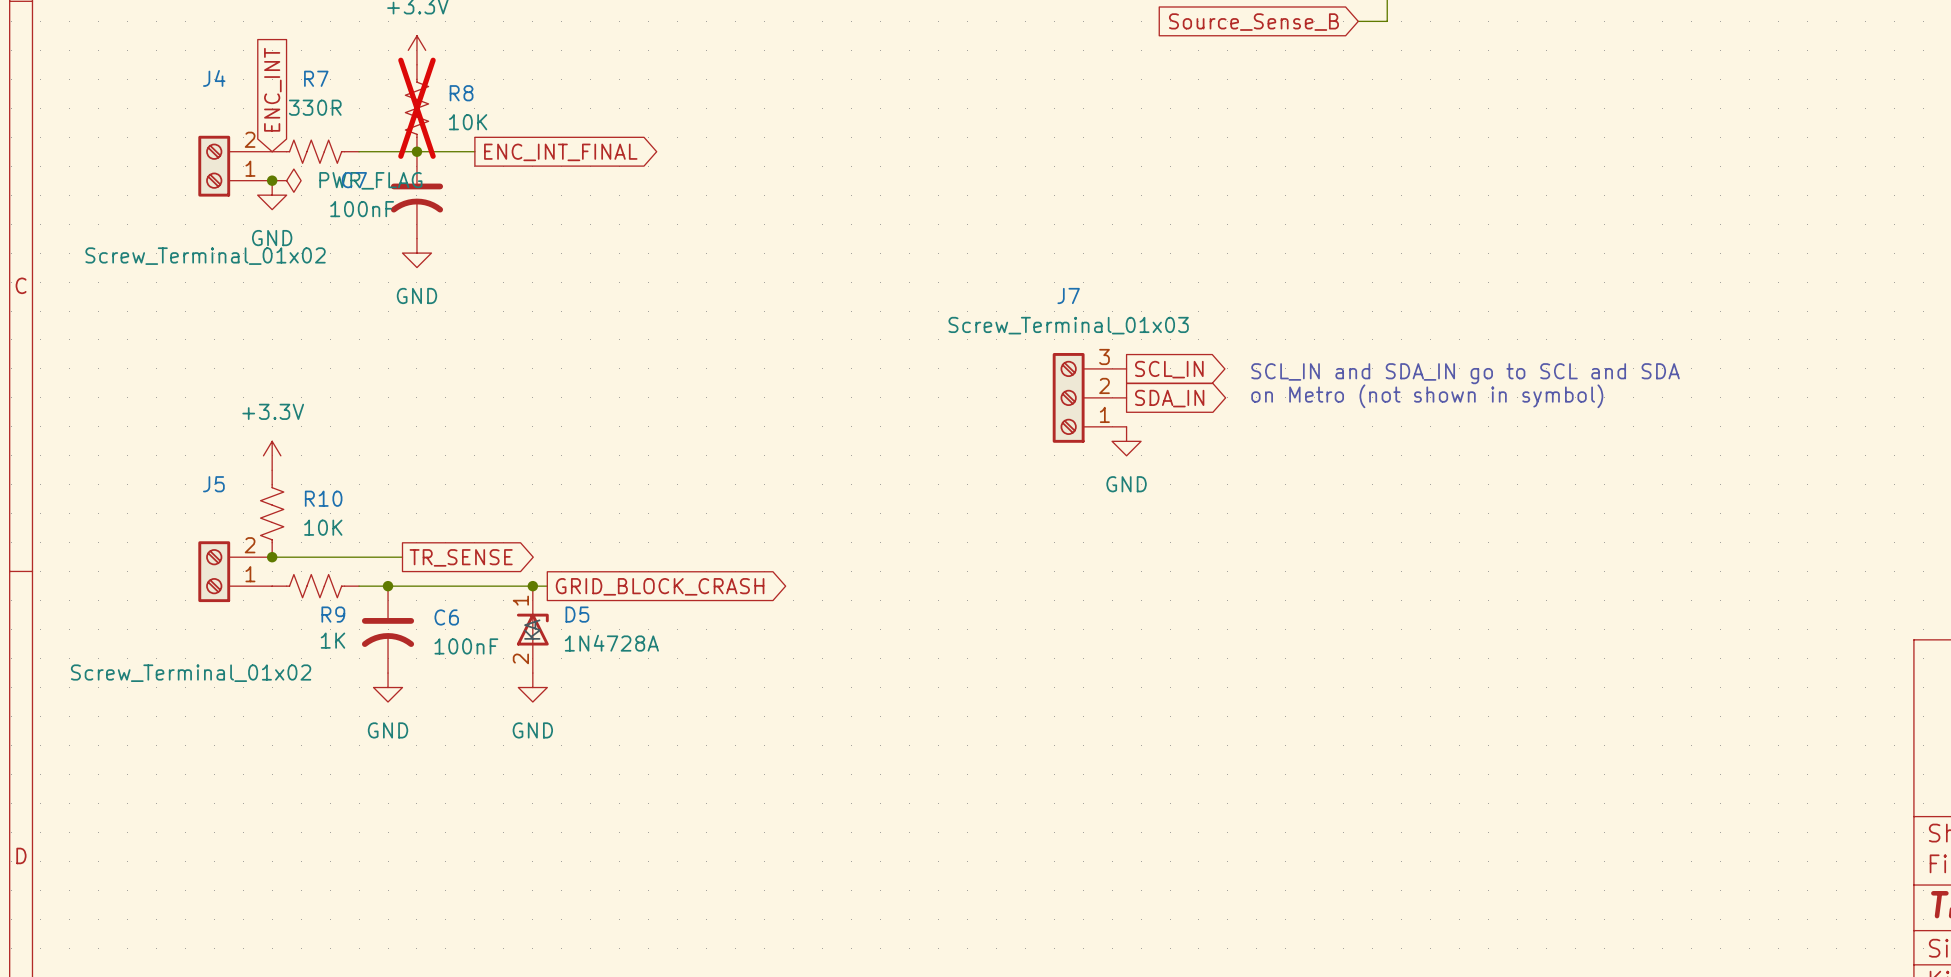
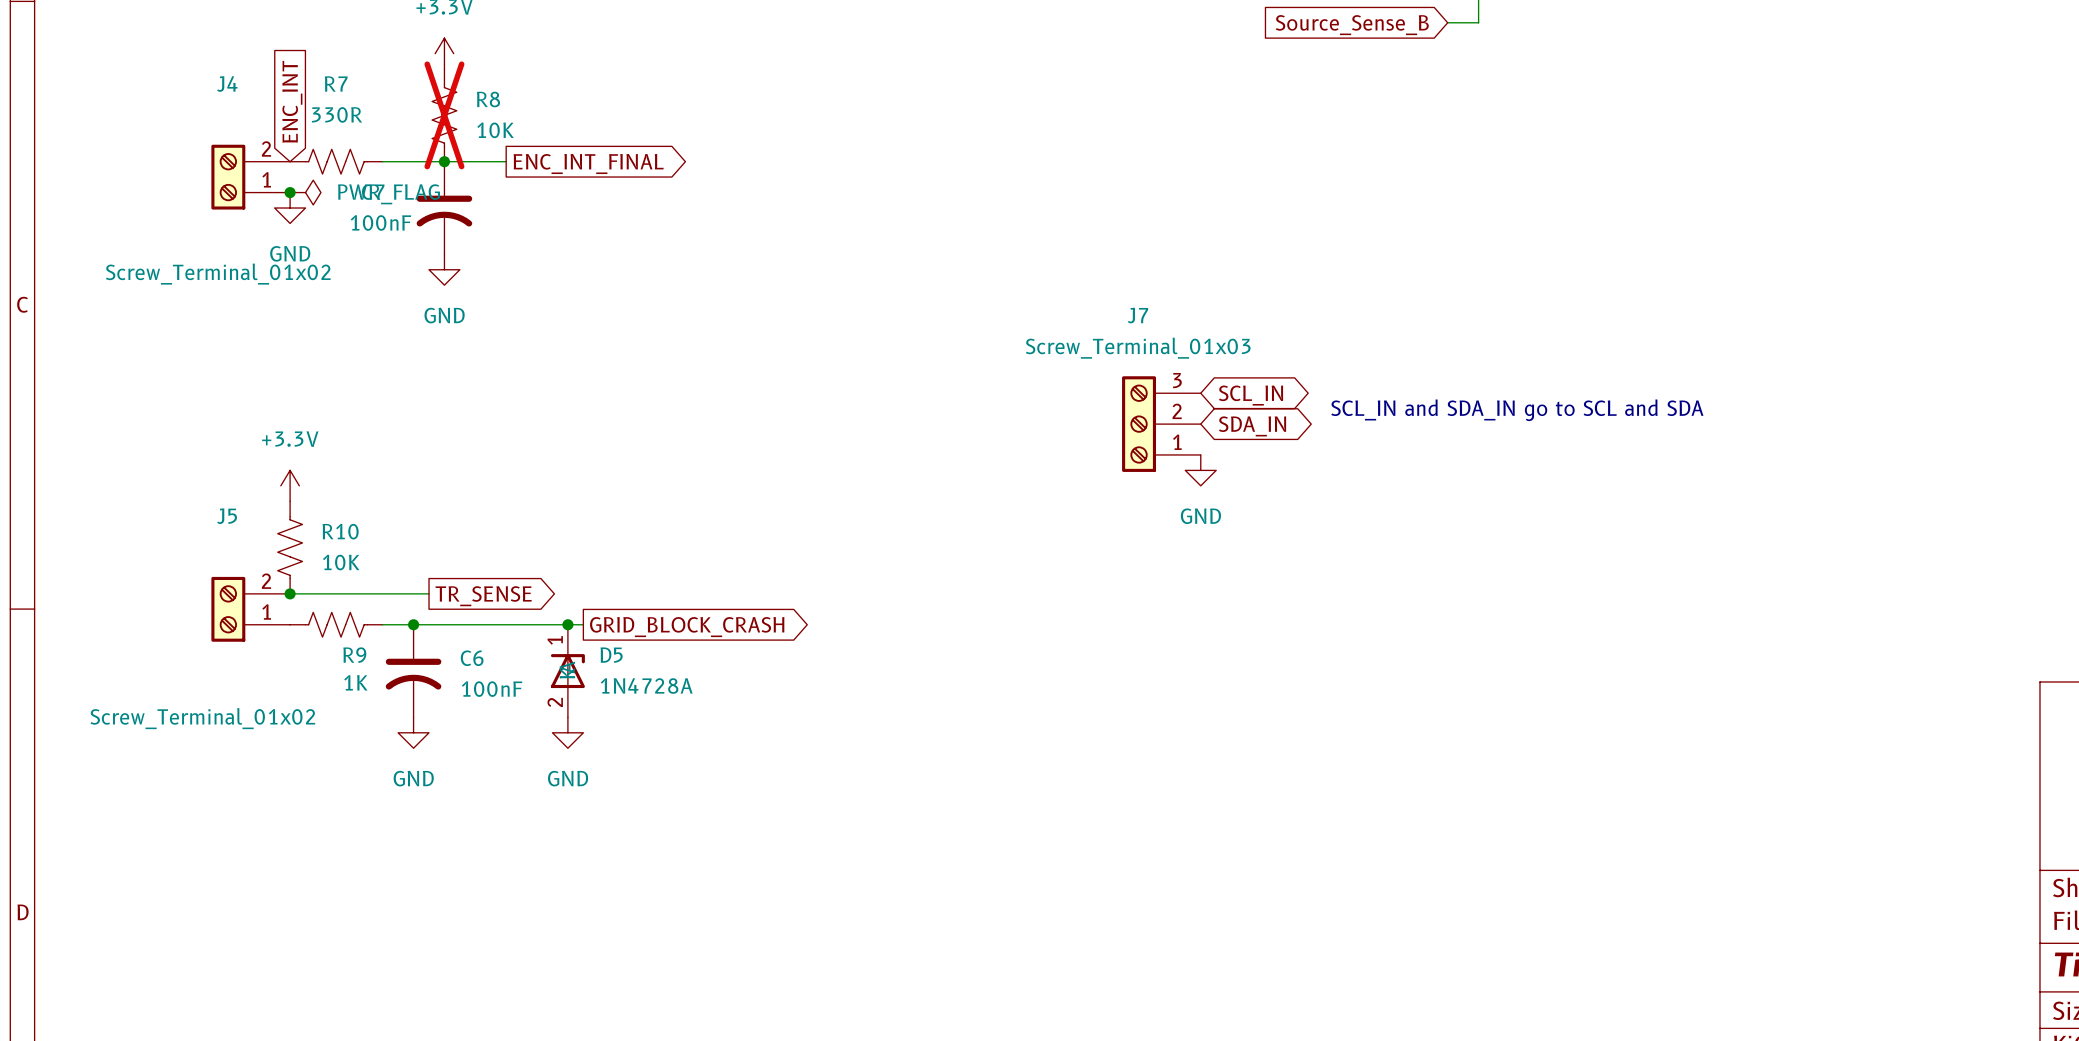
global label shape: output (1169, 369) -> bidirectional (1251, 395)
text position: SCL_IN and SDA_IN go to SCL and SDA (1465, 373) -> SCL_IN and SDA_IN go to SCL and SDA (1517, 410)
text: on Metro (not shown in symbol) (1427, 396) -> none
global label shape: output (1169, 398) -> bidirectional (1252, 426)

